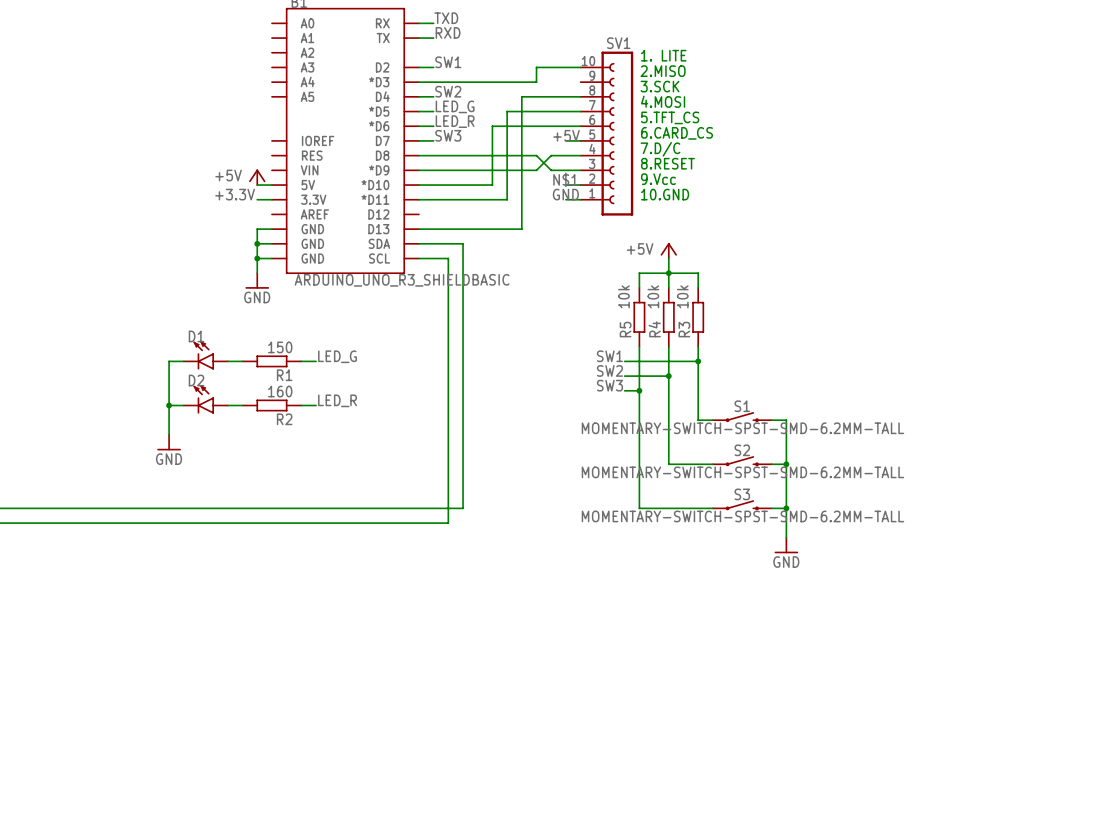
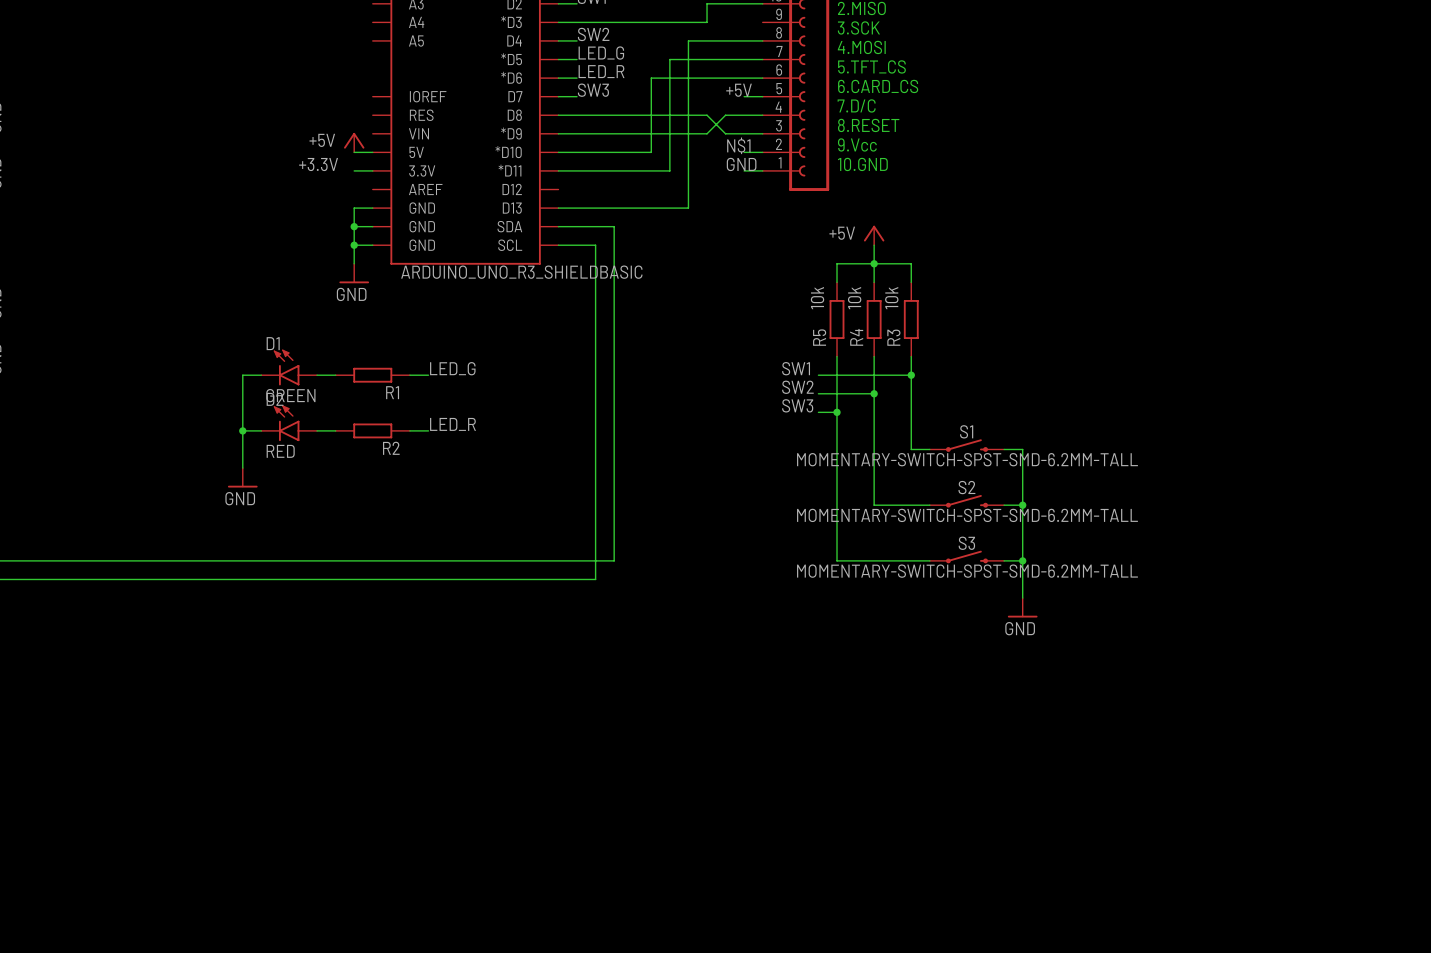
R1 value: 150 (280, 347) -> none
D1 value: none -> GREEN (290, 395)
R2 value: 160 (280, 391) -> none
D2 value: none -> RED (280, 451)

